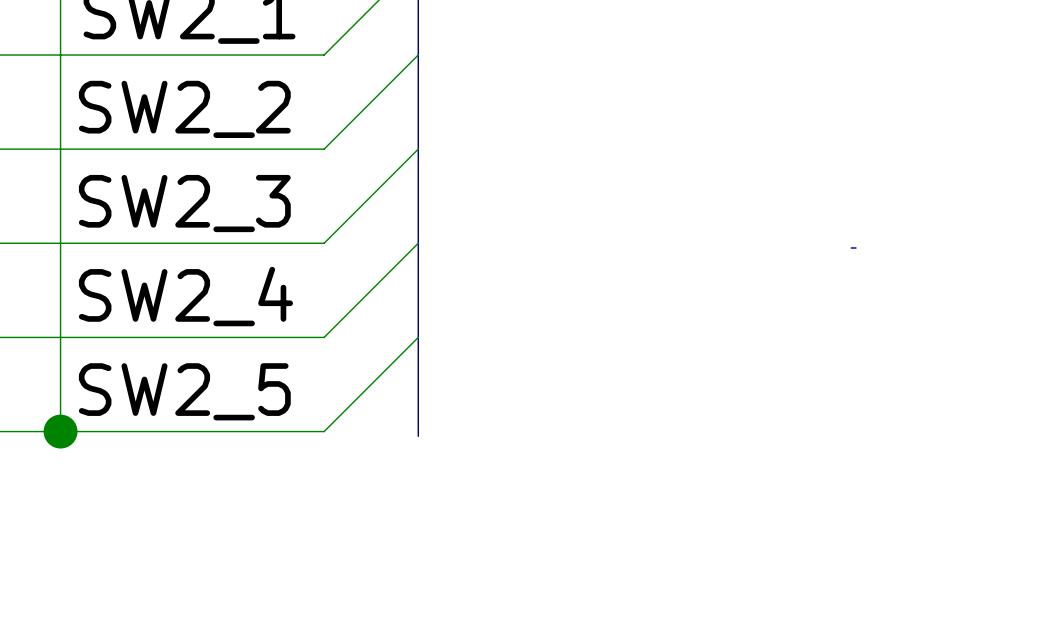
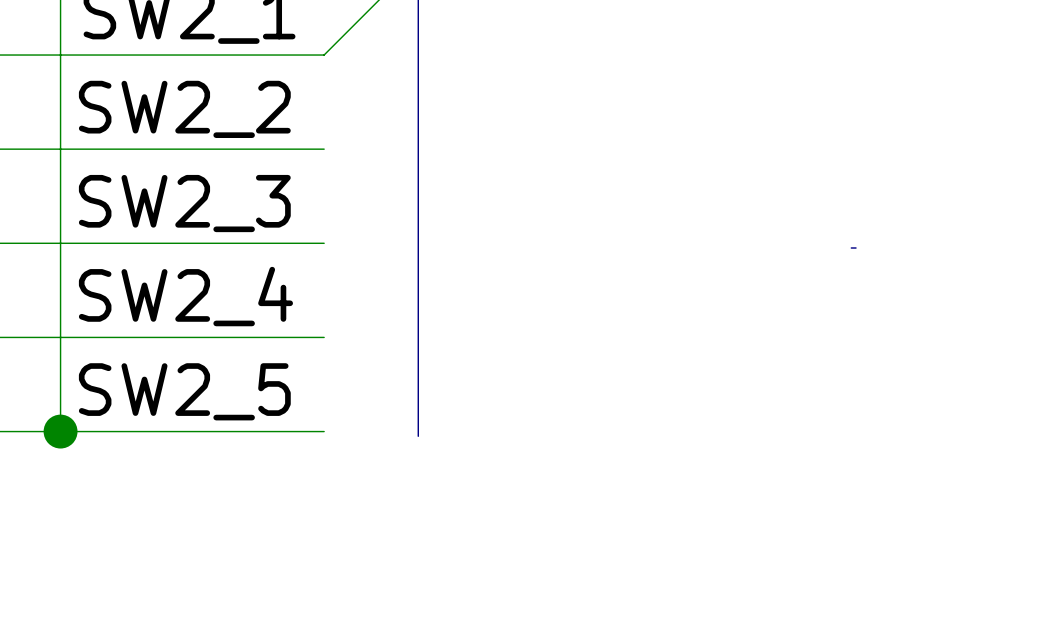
wire: (418, 55) (324, 149) -> none
wire: (418, 149) (324, 243) -> none
wire: (418, 243) (324, 337) -> none
wire: (418, 337) (324, 431) -> none

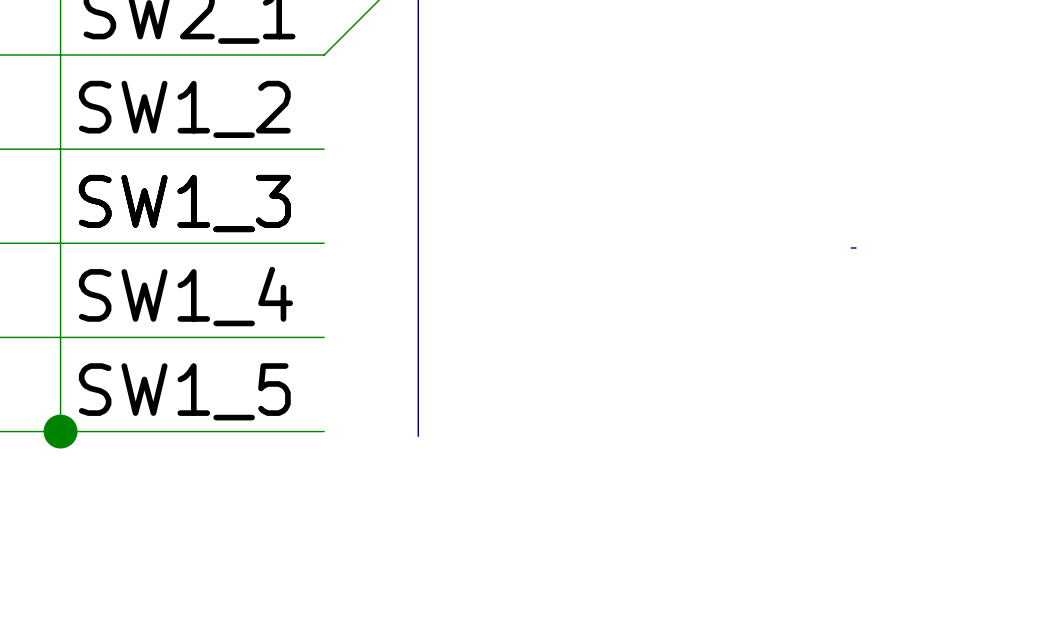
label: SW2_2 (184, 109) -> SW1_2 (184, 109)
label: SW2_3 (184, 203) -> SW1_3 (184, 203)
label: SW2_4 (185, 296) -> SW1_4 (185, 296)
label: SW2_5 (184, 391) -> SW1_5 (184, 391)

